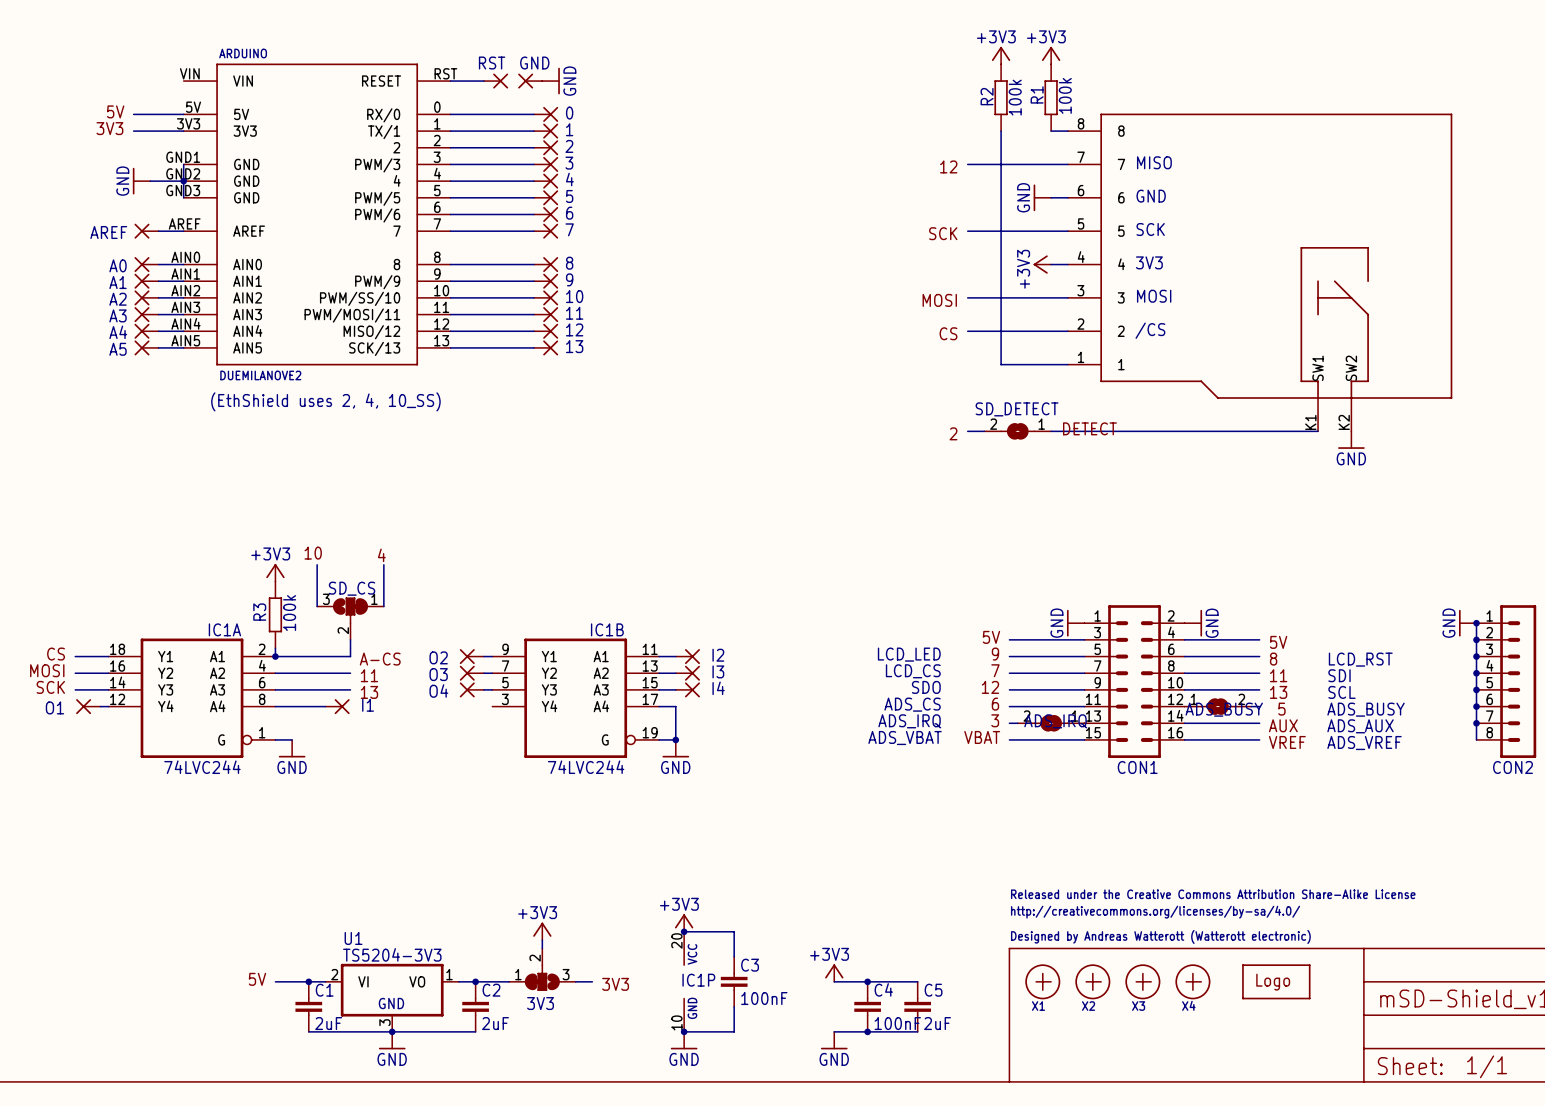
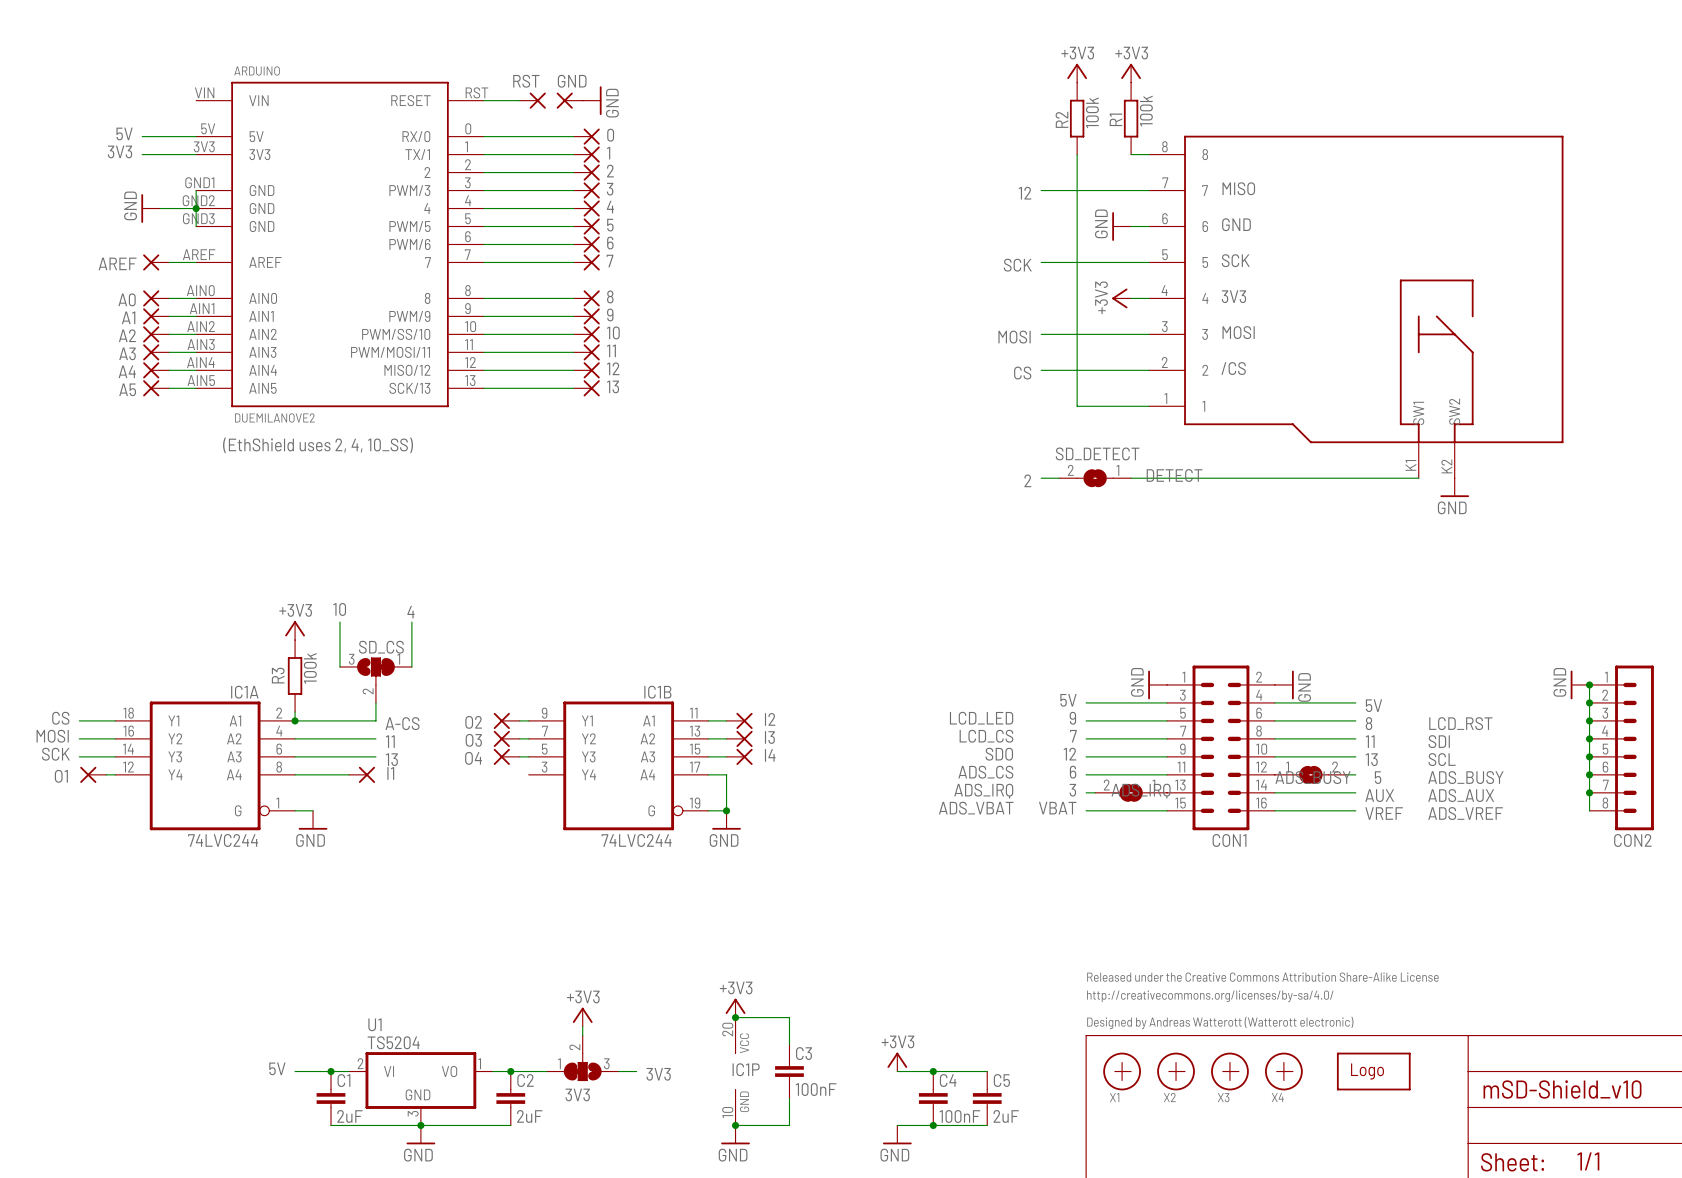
U1 value: TS5204-3V3 (392, 954) -> TS5204 (393, 1042)

